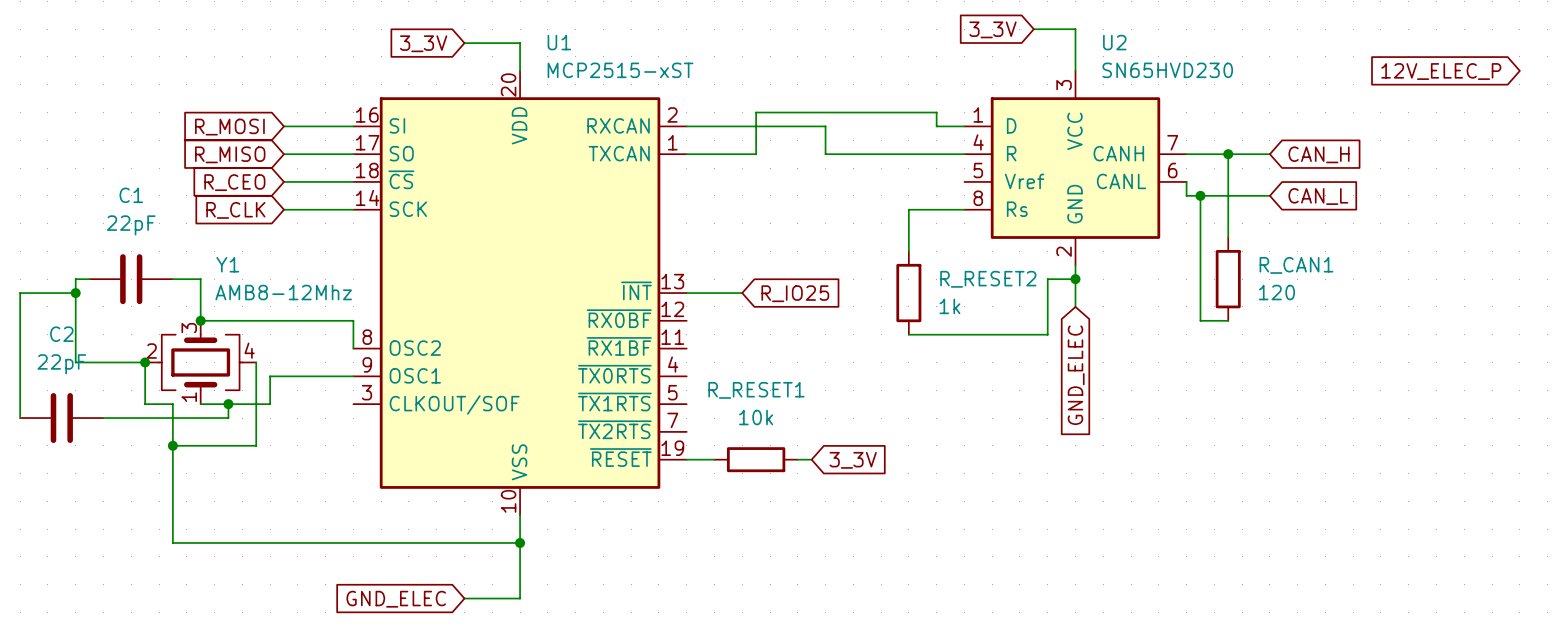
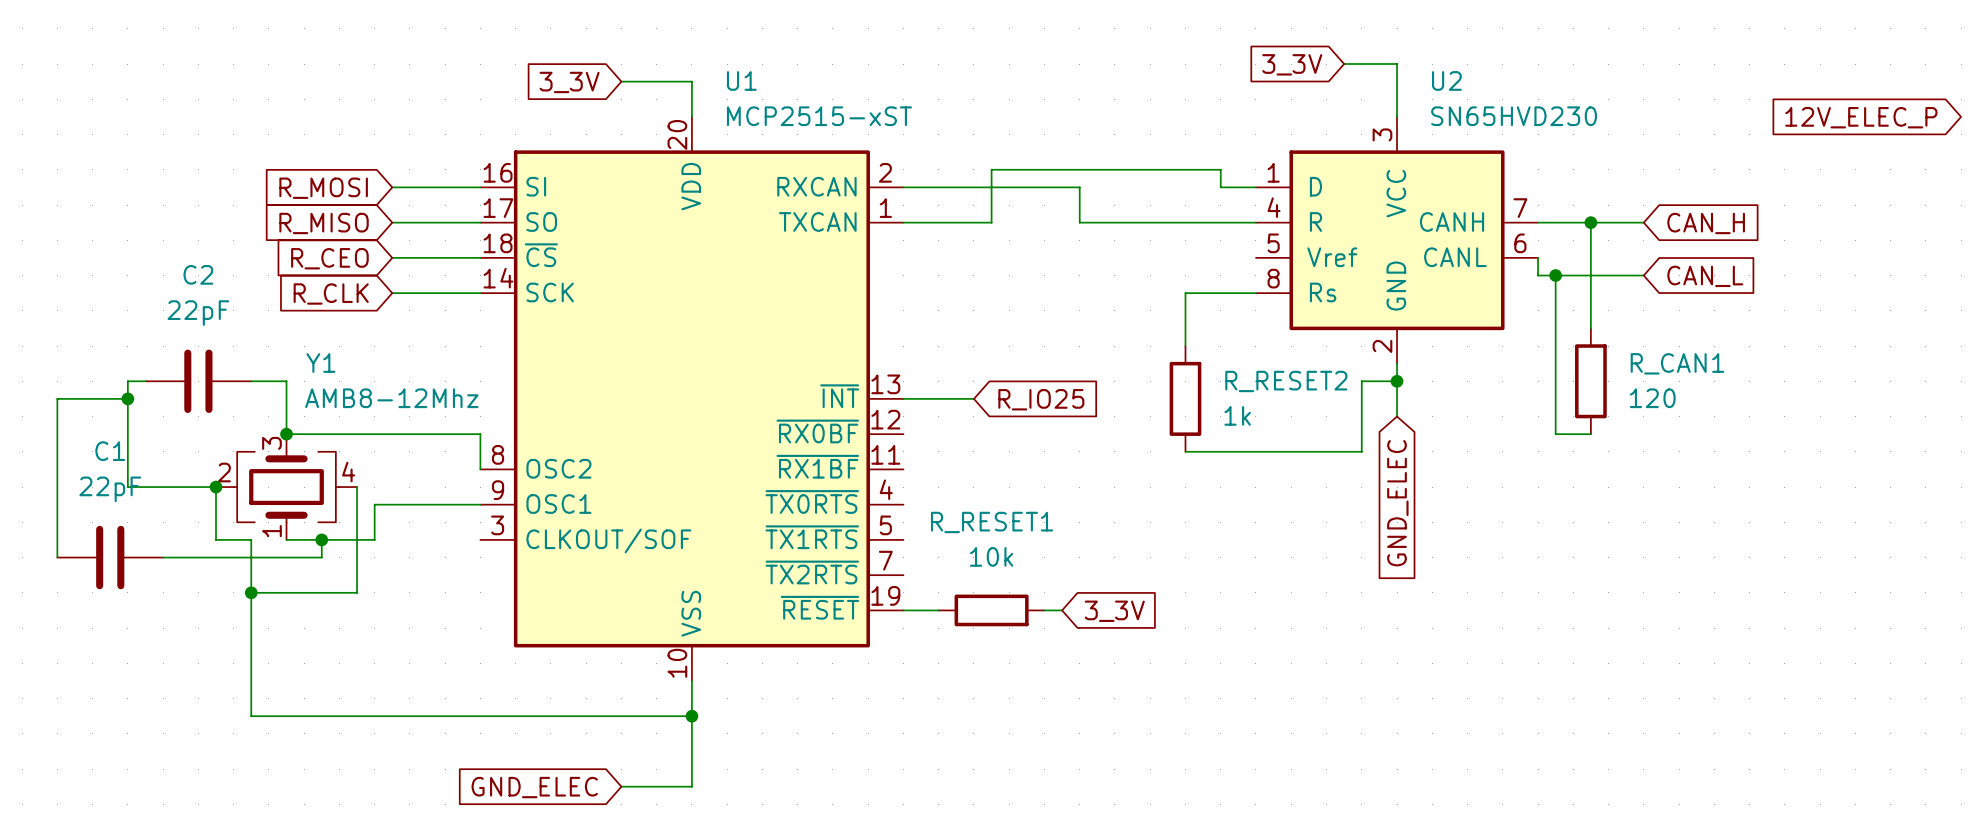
C1 name: C1 (131, 195) -> C2 (198, 274)
C2 name: C2 (61, 334) -> C1 (110, 451)

